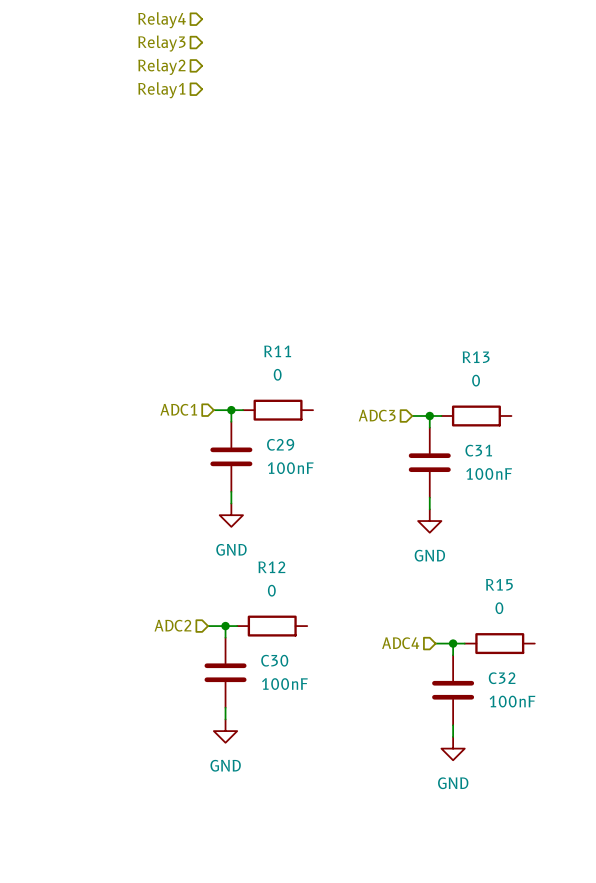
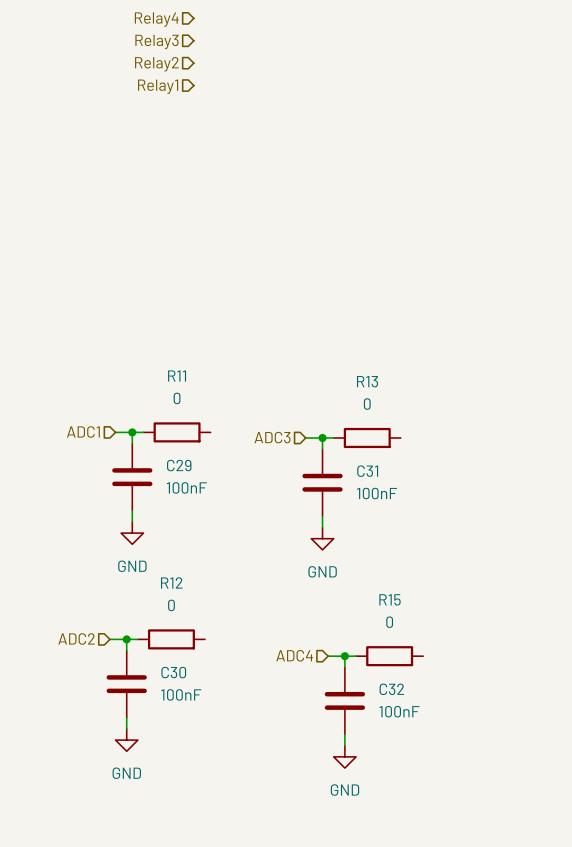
hierarchical label position: ADC1 (178, 409) -> ADC1 (83, 431)
wire: (213, 410) (243, 410) -> (115, 432) (143, 432)
wire: (231, 410) (231, 421) -> (132, 432) (132, 443)
junction: (231, 410) -> none
R11 position: (278, 410) -> (177, 432)
hierarchical label position: ADC3 (377, 415) -> ADC3 (272, 437)
wire: (412, 416) (441, 416) -> (305, 437) (333, 437)
wire: (429, 416) (429, 427) -> (322, 437) (322, 449)
junction: (429, 416) -> none
R13 position: (476, 416) -> (367, 437)
junction: none -> (132, 432)
C29 position: (231, 456) -> (132, 477)
junction: none -> (322, 437)
C31 position: (429, 462) -> (322, 482)
wire: (231, 491) (231, 503) -> (132, 510) (132, 521)
wire: (429, 497) (429, 509) -> (322, 516) (322, 527)
power symbol: GND (231, 515) -> none
power symbol: GND (429, 521) -> none
power symbol: none -> GND (132, 533)
power symbol: none -> GND (322, 538)
hierarchical label position: ADC2 (172, 625) -> ADC2 (76, 638)
wire: (208, 626) (237, 626) -> (109, 639) (137, 639)
wire: (225, 626) (225, 637) -> (126, 639) (126, 650)
junction: (225, 626) -> none
R12 position: (272, 626) -> (171, 639)
hierarchical label position: ADC4 (400, 643) -> ADC4 (294, 655)
wire: (435, 643) (464, 643) -> (328, 656) (356, 656)
wire: (453, 643) (453, 655) -> (344, 656) (344, 667)
junction: (453, 643) -> none
R15 position: (499, 643) -> (389, 656)
junction: none -> (126, 639)
C30 position: (225, 672) -> (126, 684)
junction: none -> (344, 656)
C32 position: (453, 690) -> (344, 700)
wire: (225, 707) (225, 719) -> (126, 717) (126, 728)
wire: (453, 725) (453, 736) -> (344, 734) (344, 745)
power symbol: GND (225, 731) -> none
power symbol: GND (453, 748) -> none
power symbol: none -> GND (126, 740)
power symbol: none -> GND (344, 756)

